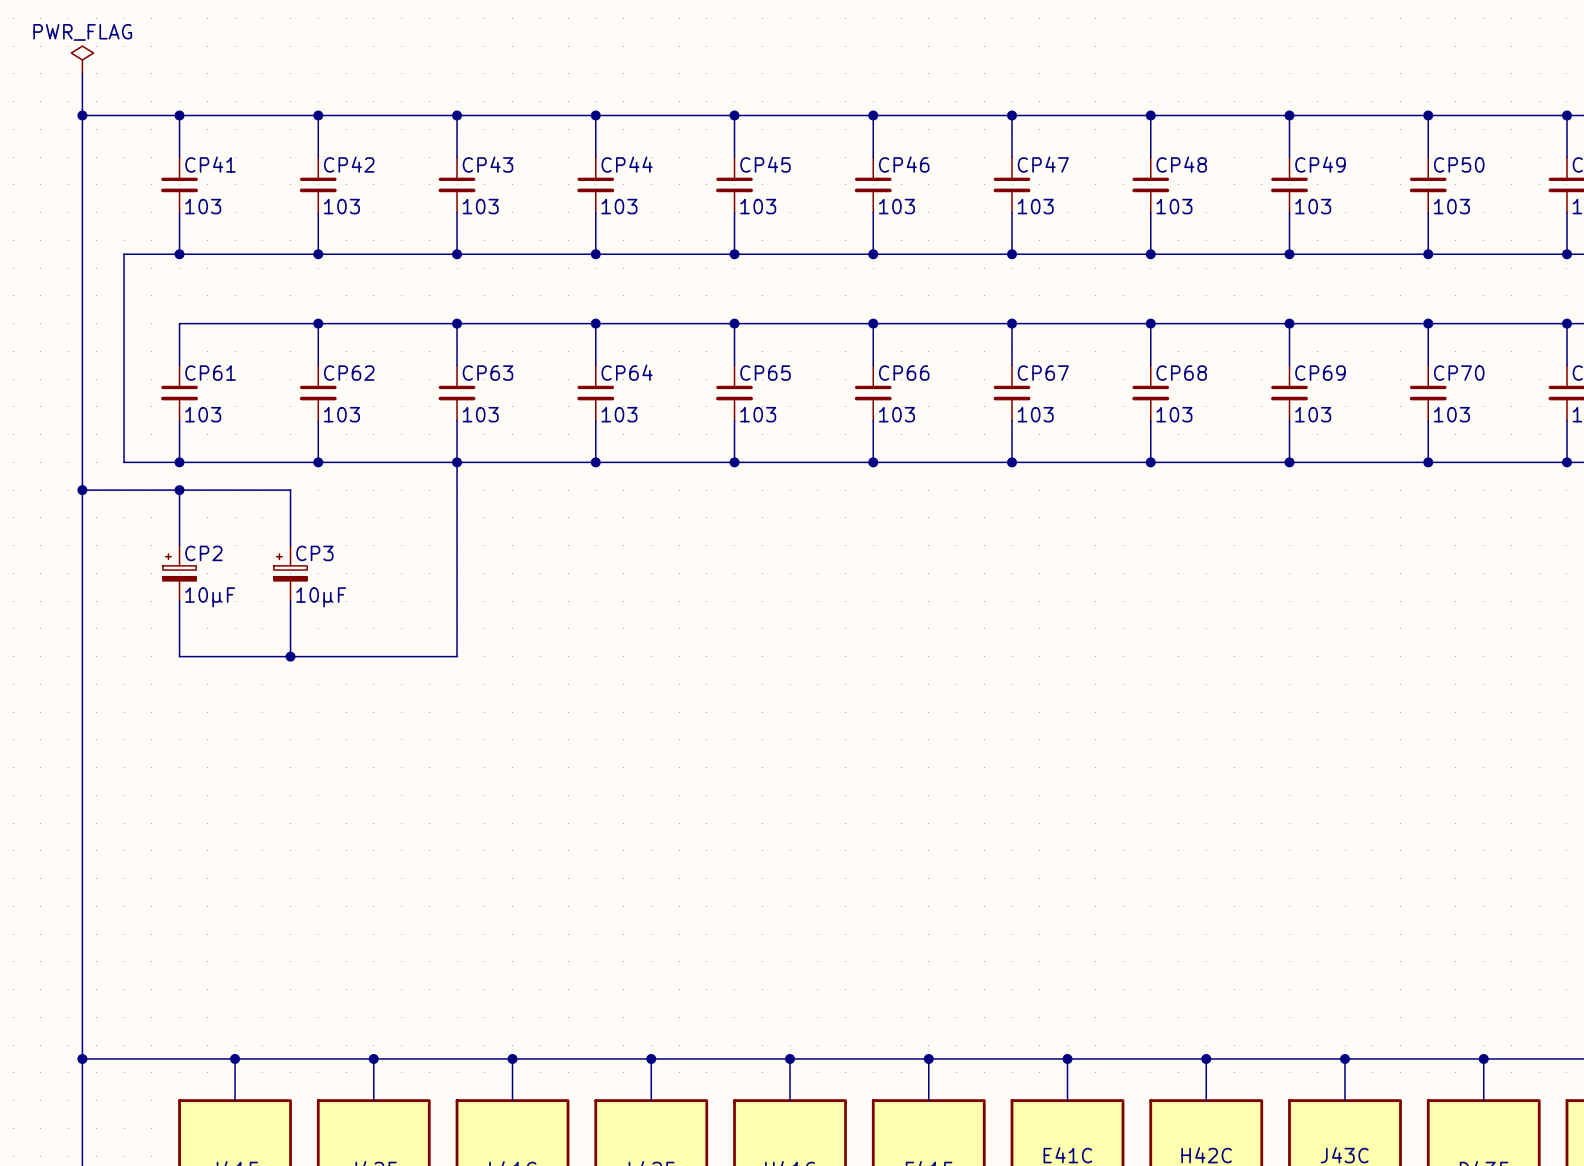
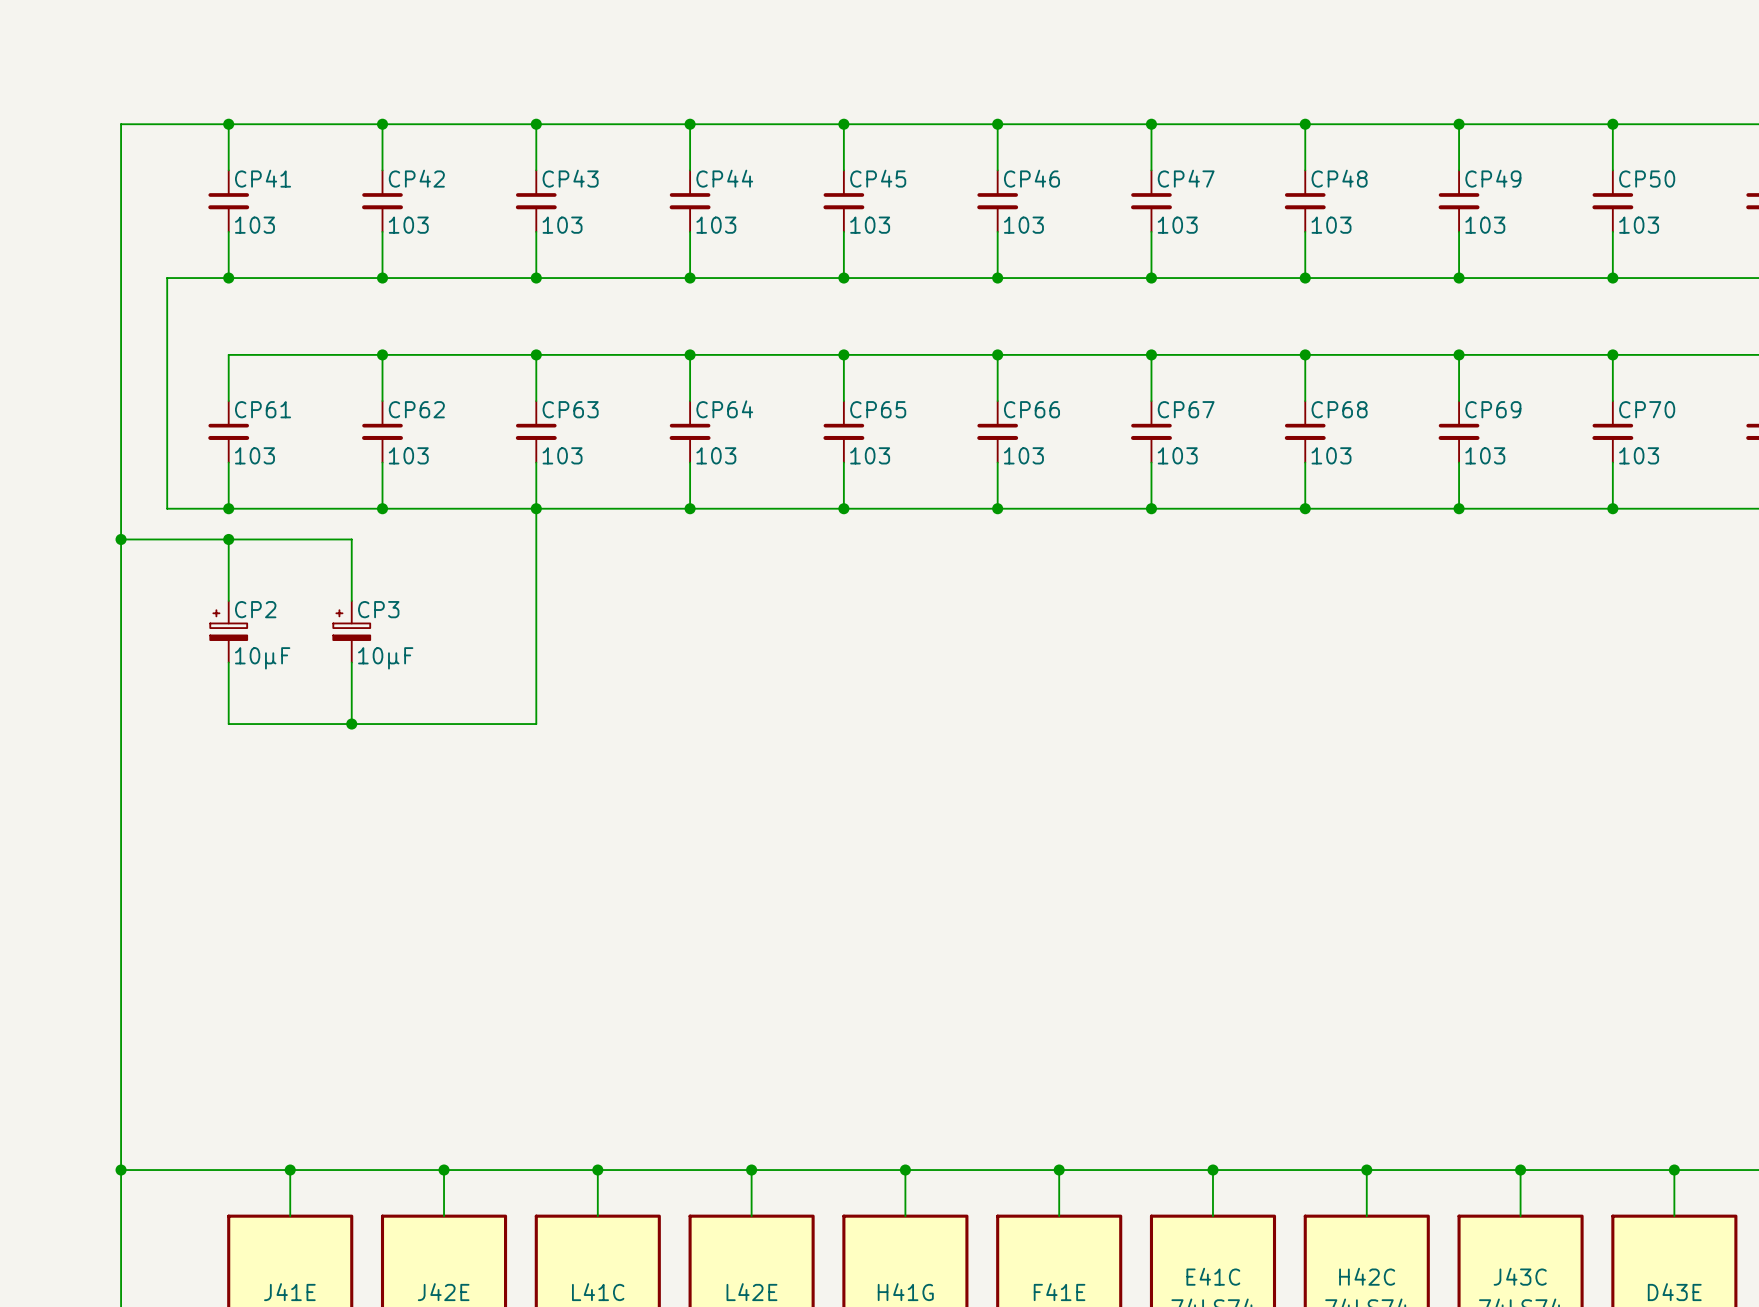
power symbol: PWR_FLAG (82, 60) -> none
wire: (82, 73) (82, 115) -> none
junction: (82, 115) -> none

